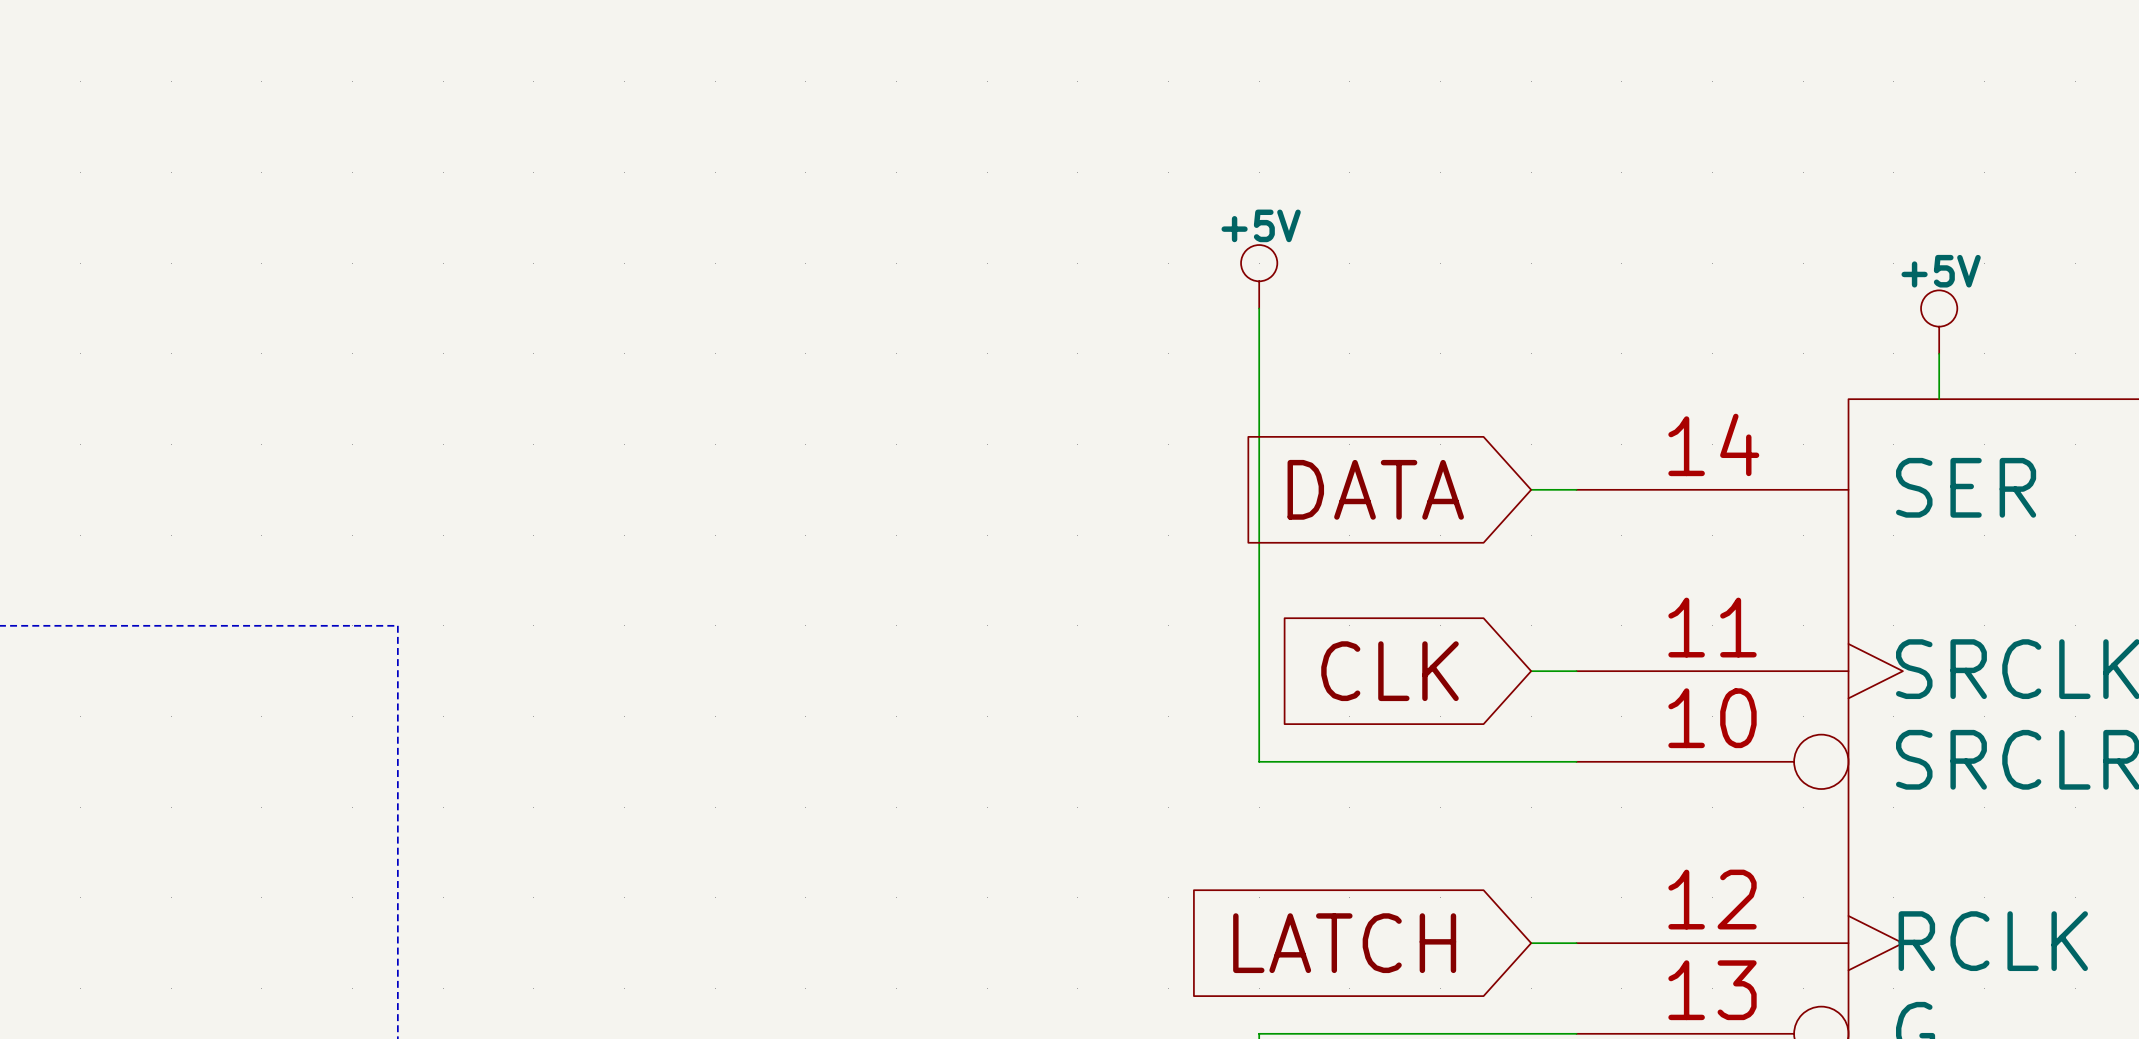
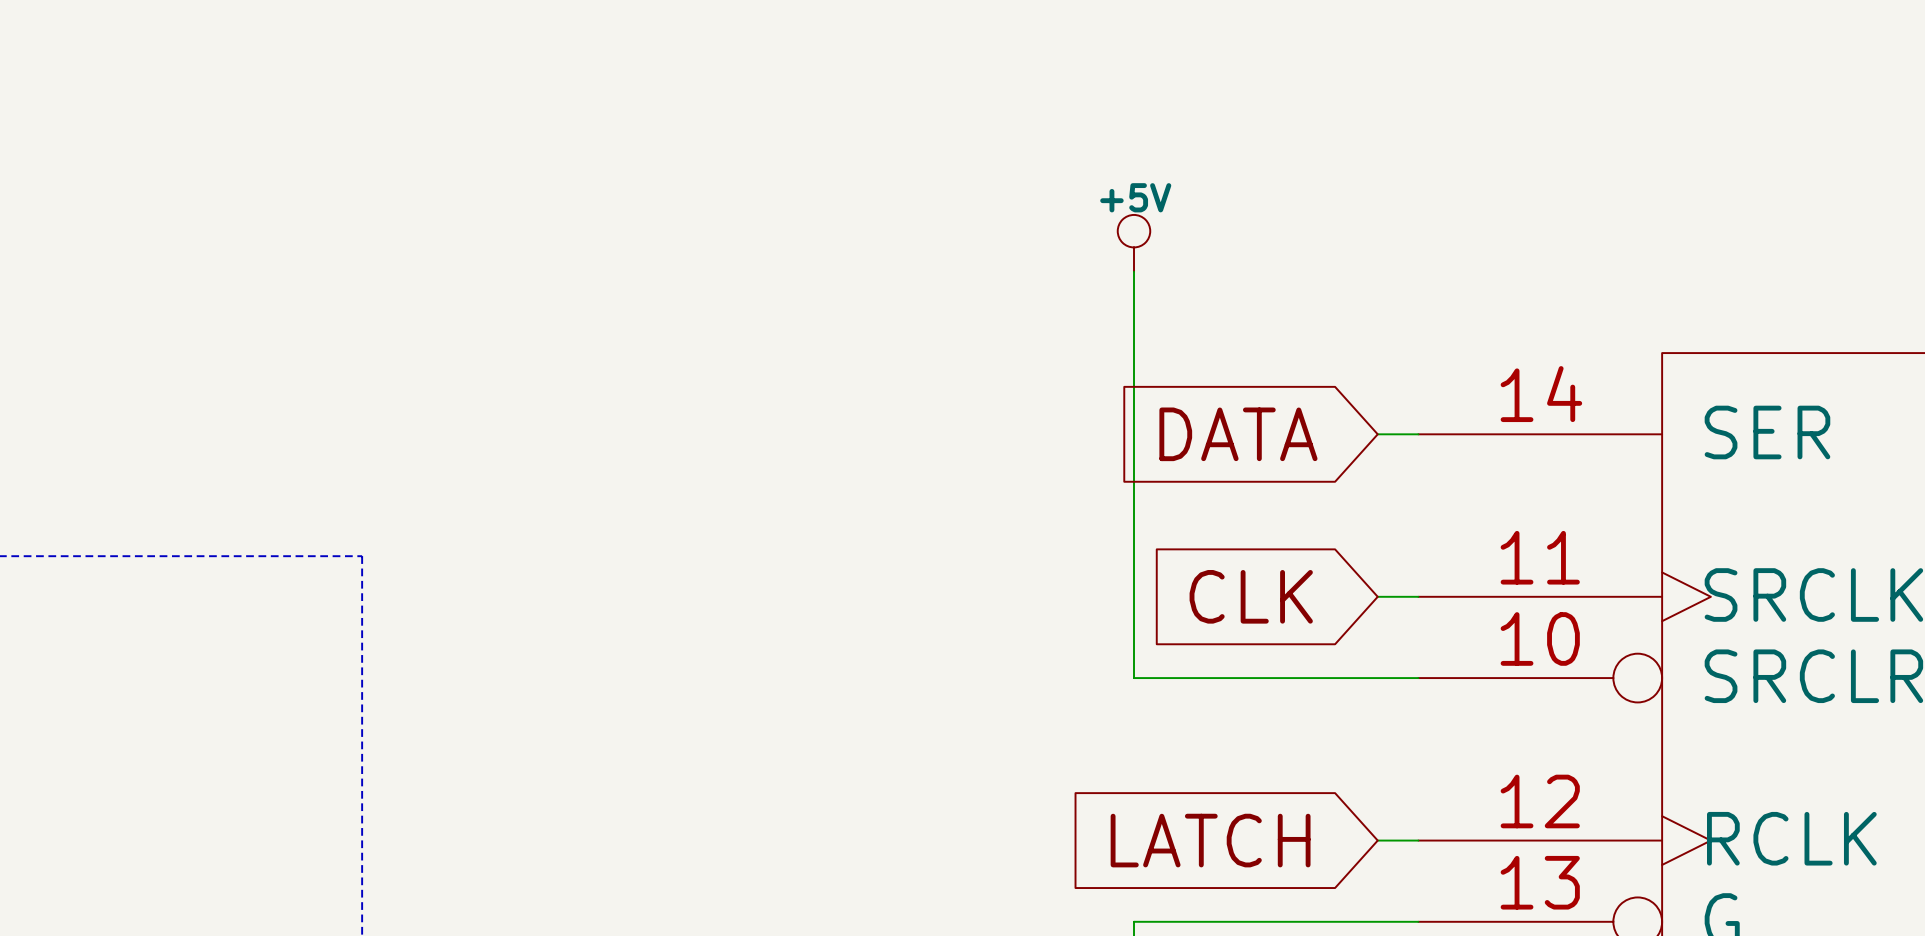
power symbol: +5V (1939, 322) -> none
wire: (1939, 353) (1939, 399) -> none

